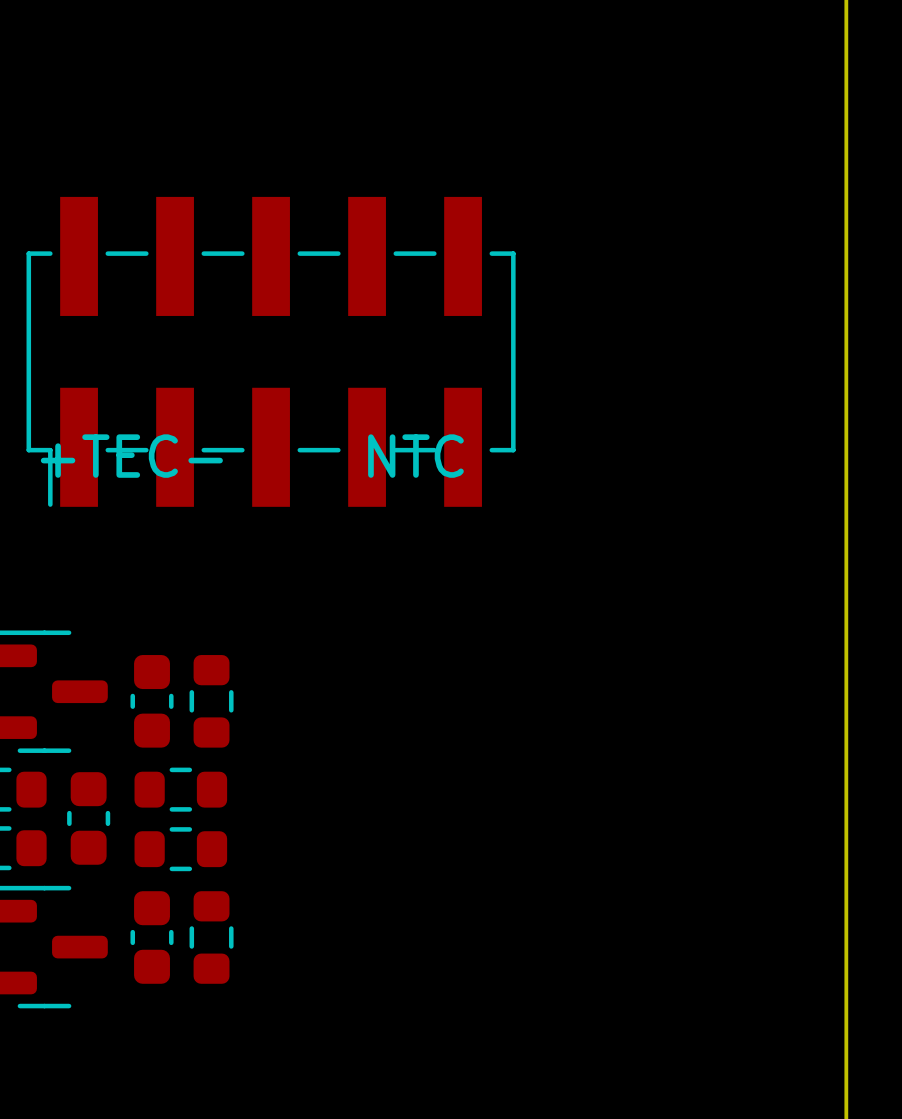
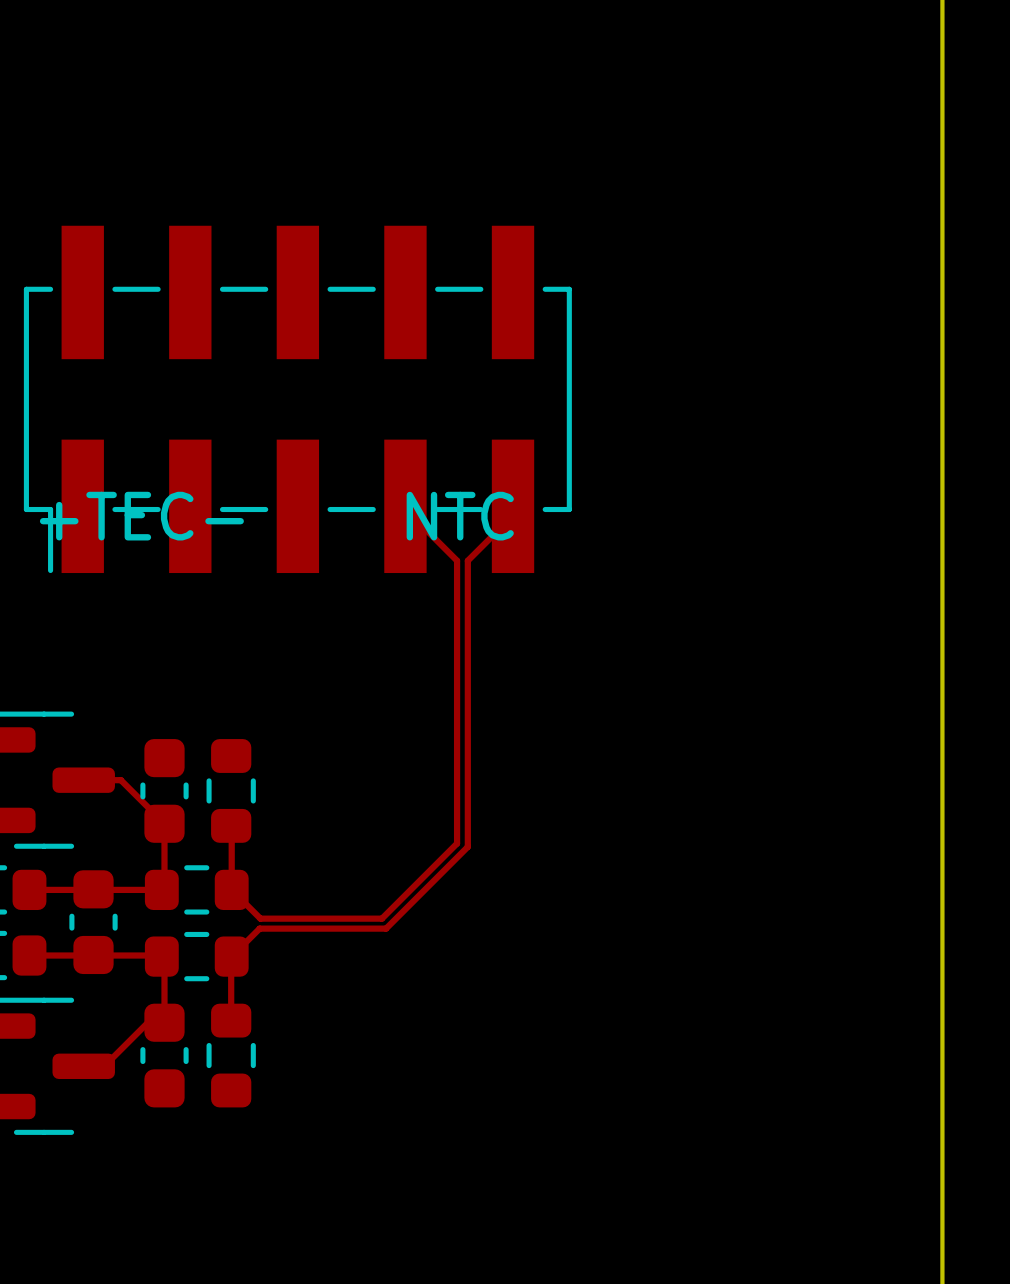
top track: none -> (405, 506) (405, 509) (457, 560) (457, 843) (381, 918) (260, 918) (231, 889) (231, 826)
top track: none -> (513, 506) (513, 515) (467, 560) (467, 846) (386, 928) (259, 928) (231, 957) (231, 1020)
top track: none -> (83, 780) (120, 780) (164, 823) (164, 887) (161, 889) (29, 889)
top track: none -> (29, 955) (160, 955) (164, 959) (164, 1022) (147, 1022) (104, 1066) (83, 1066)

